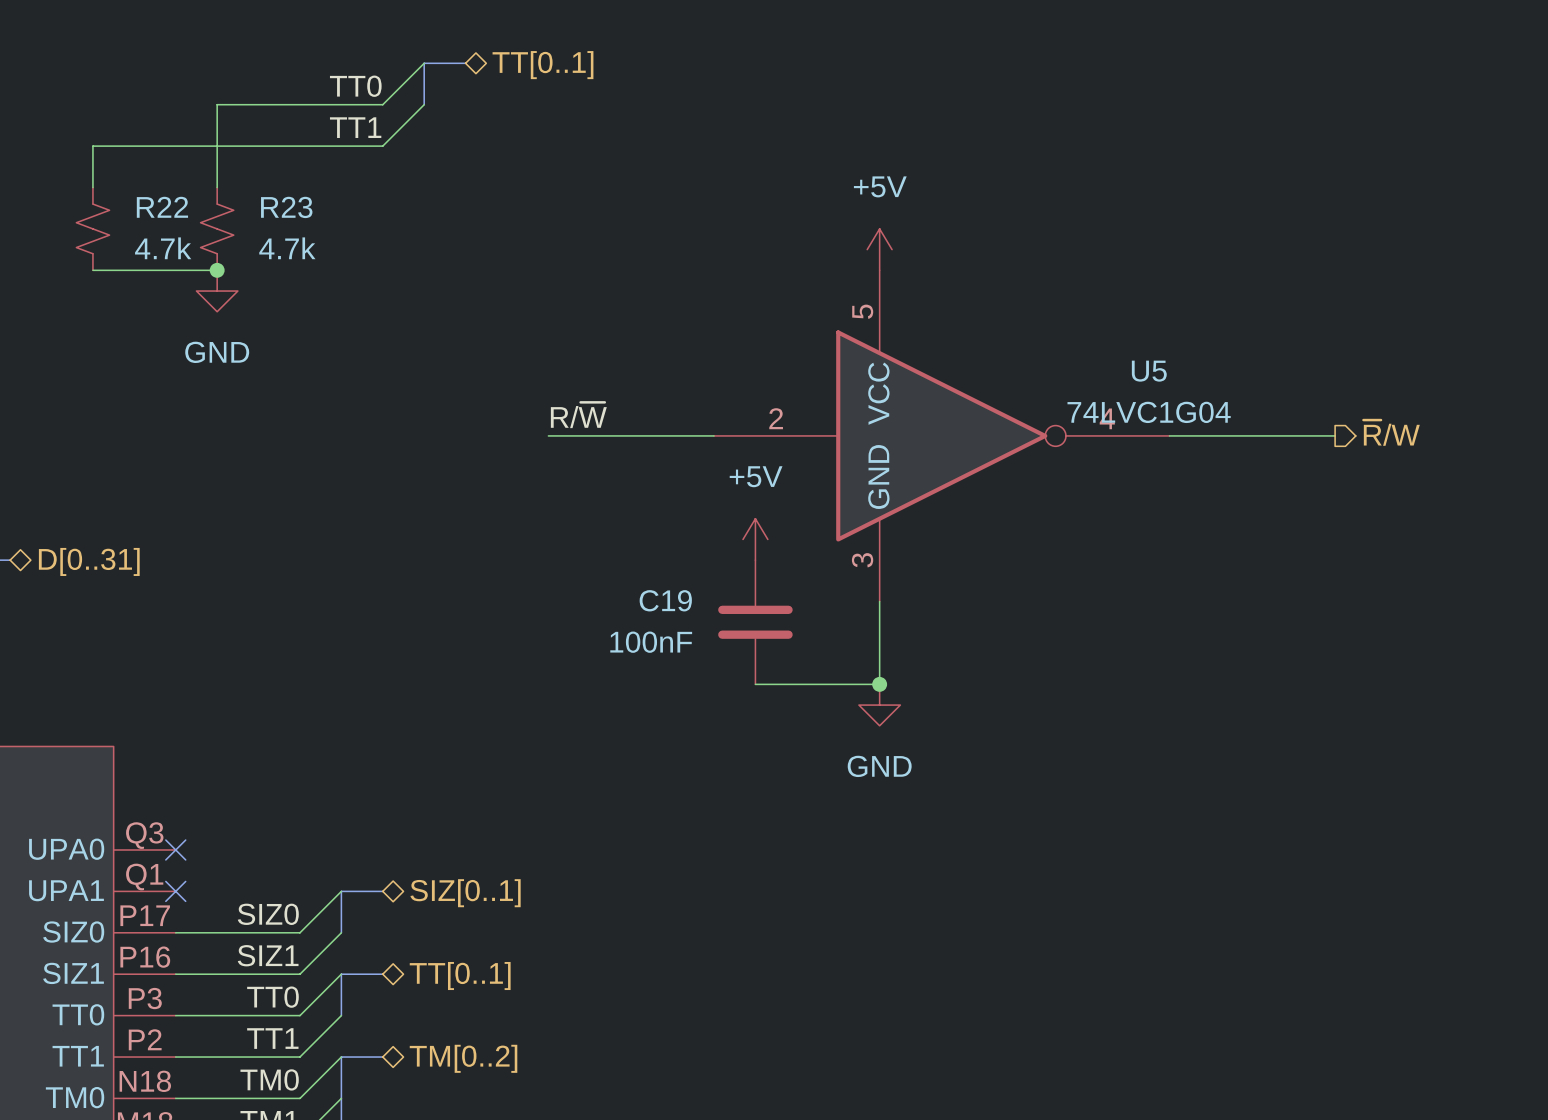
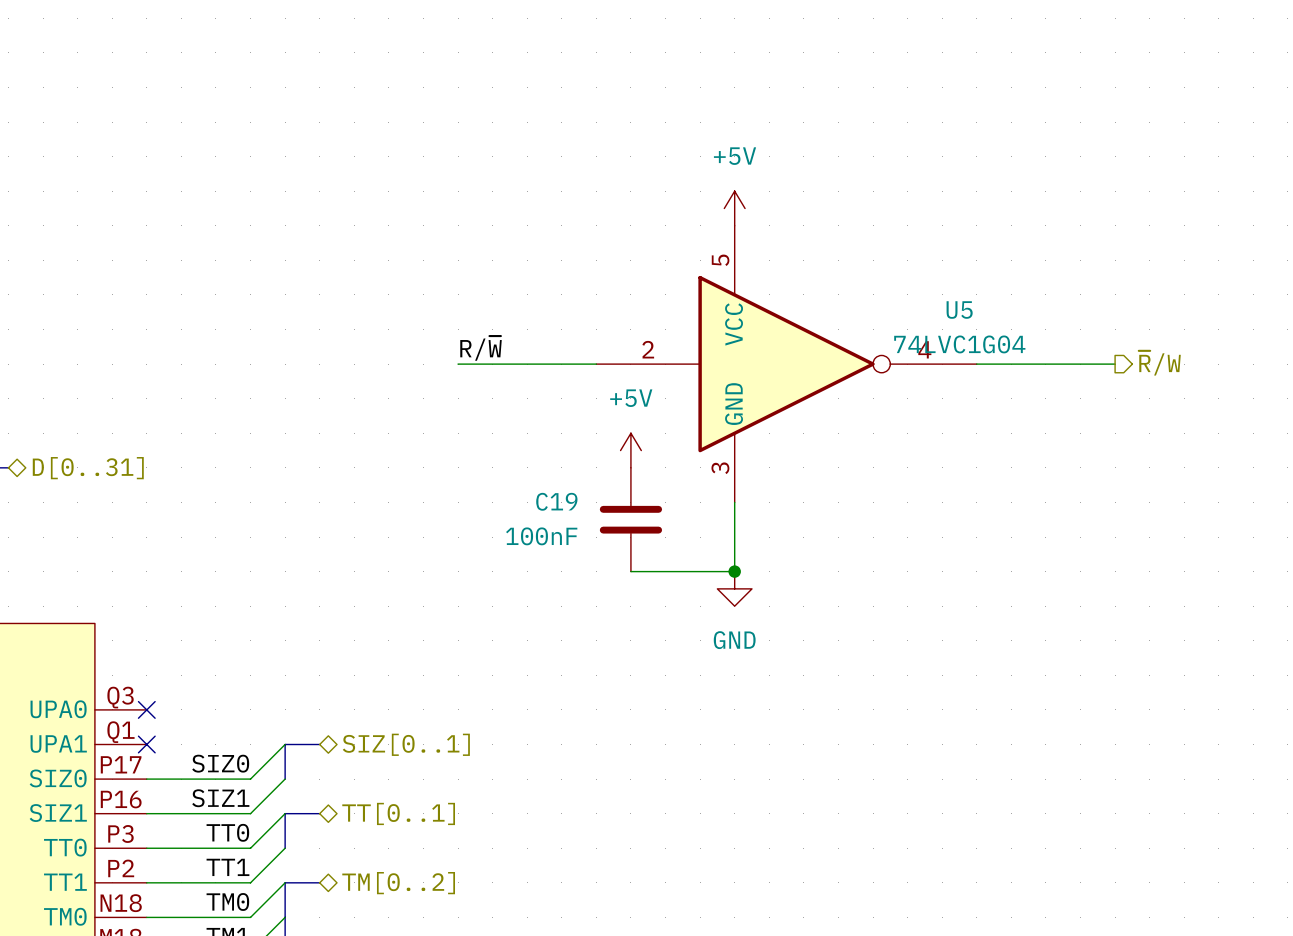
wire: (424, 63) (382, 104) (217, 104) (217, 187) -> none
bus: (465, 63) (424, 63) (424, 104) -> none
hierarchical label: TT[0..1] (542, 65) -> none
label: TT0 (355, 86) -> none
wire: (424, 104) (382, 146) (92, 146) (92, 187) -> none
label: TT1 (355, 127) -> none
R22: 4.7k (92, 228) -> none
R23: 4.7k (217, 228) -> none
wire: (92, 270) (217, 270) -> none
junction: (217, 270) -> none
power symbol: GND (217, 291) -> none

